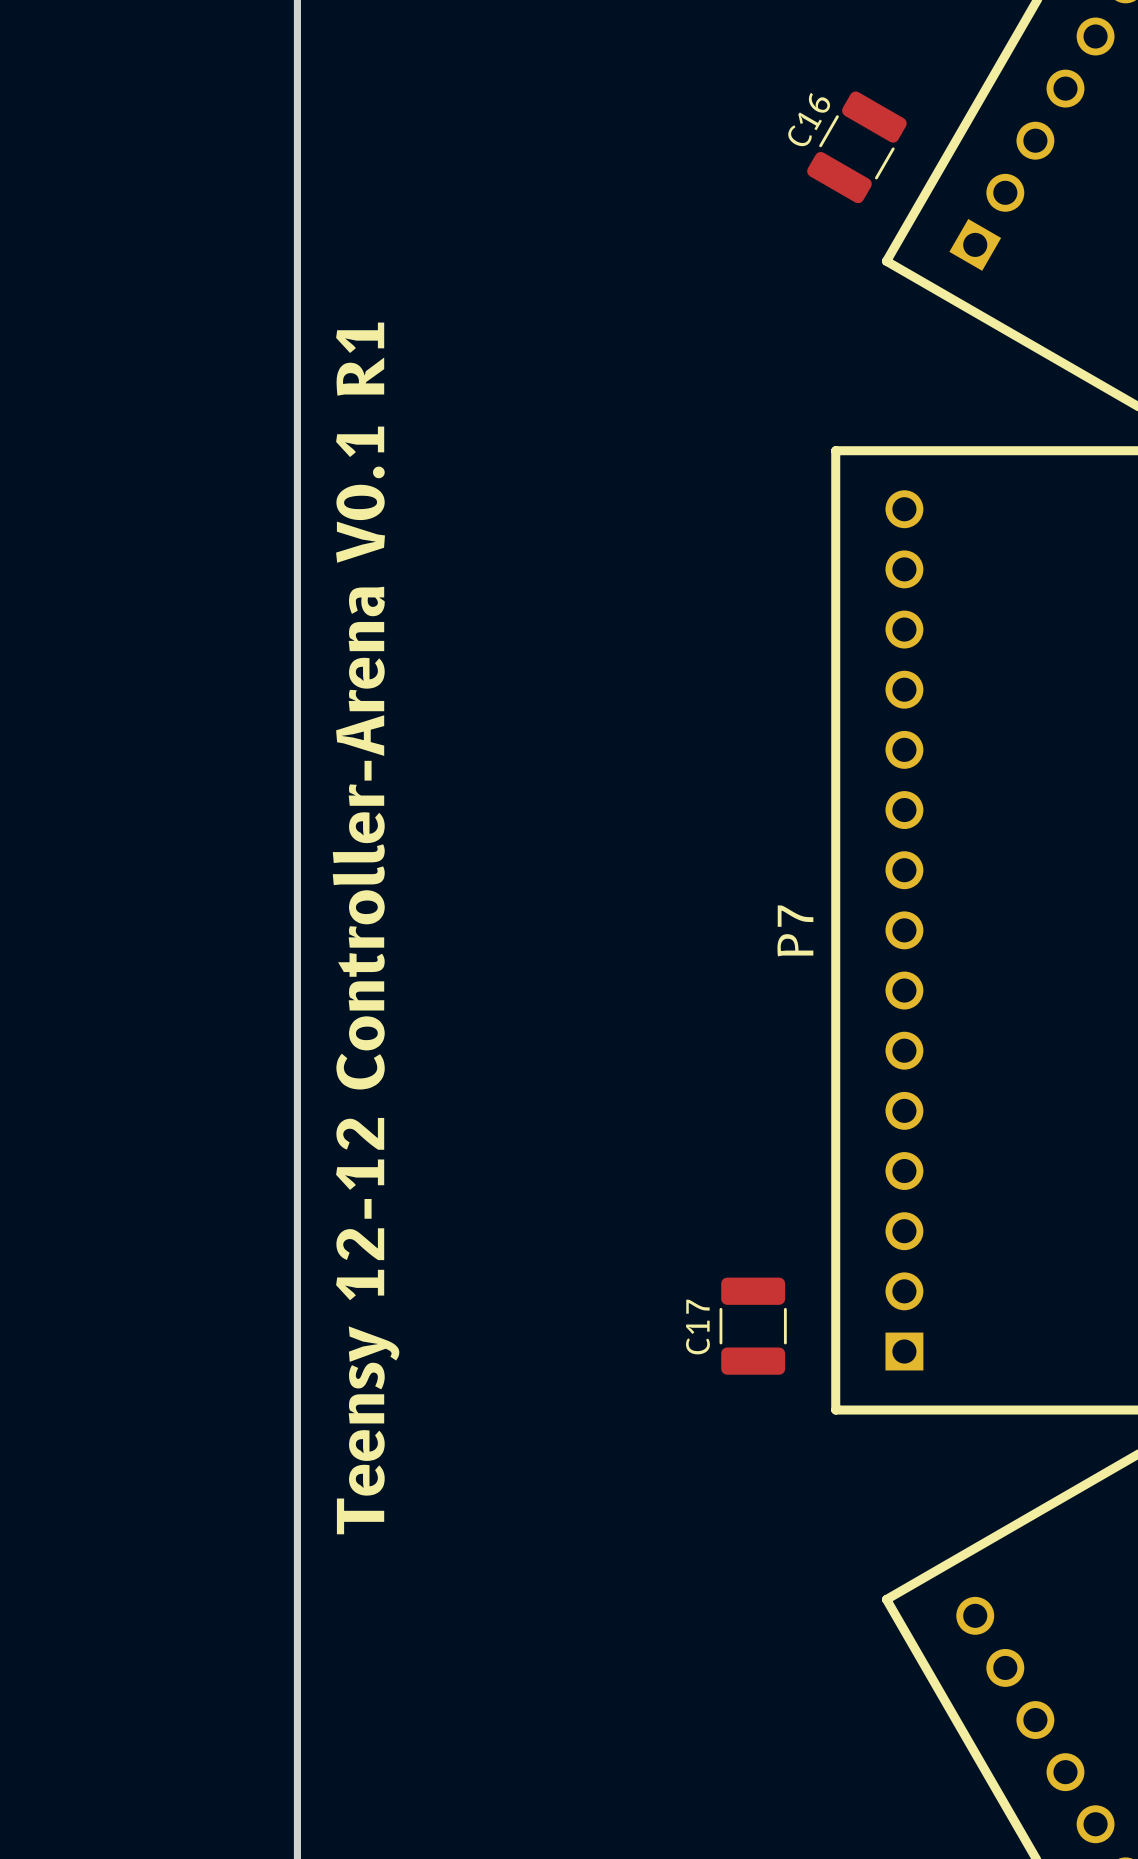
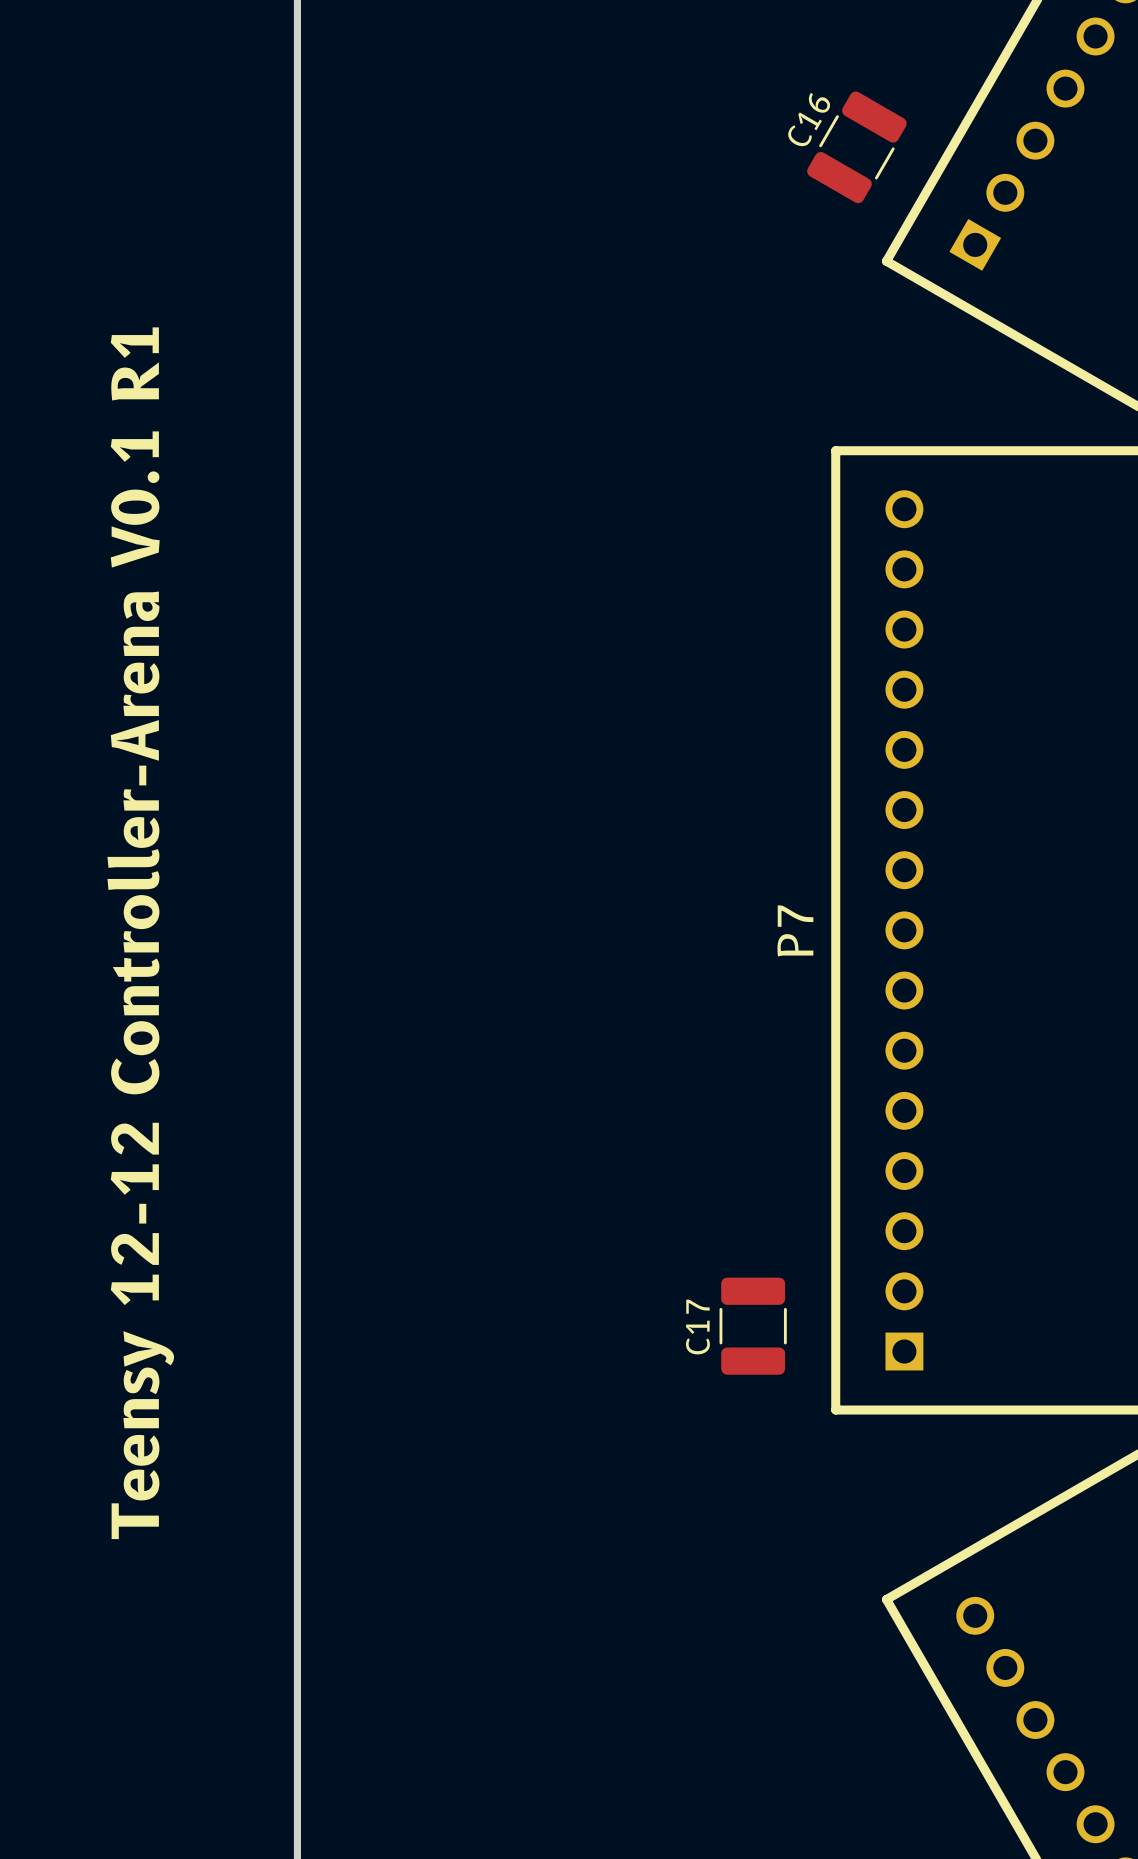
text position: Teensy 12-12 Controller-Arena V0.1 R1 (366, 928) -> Teensy 12-12 Controller-Arena V0.1 R1 (140, 933)

